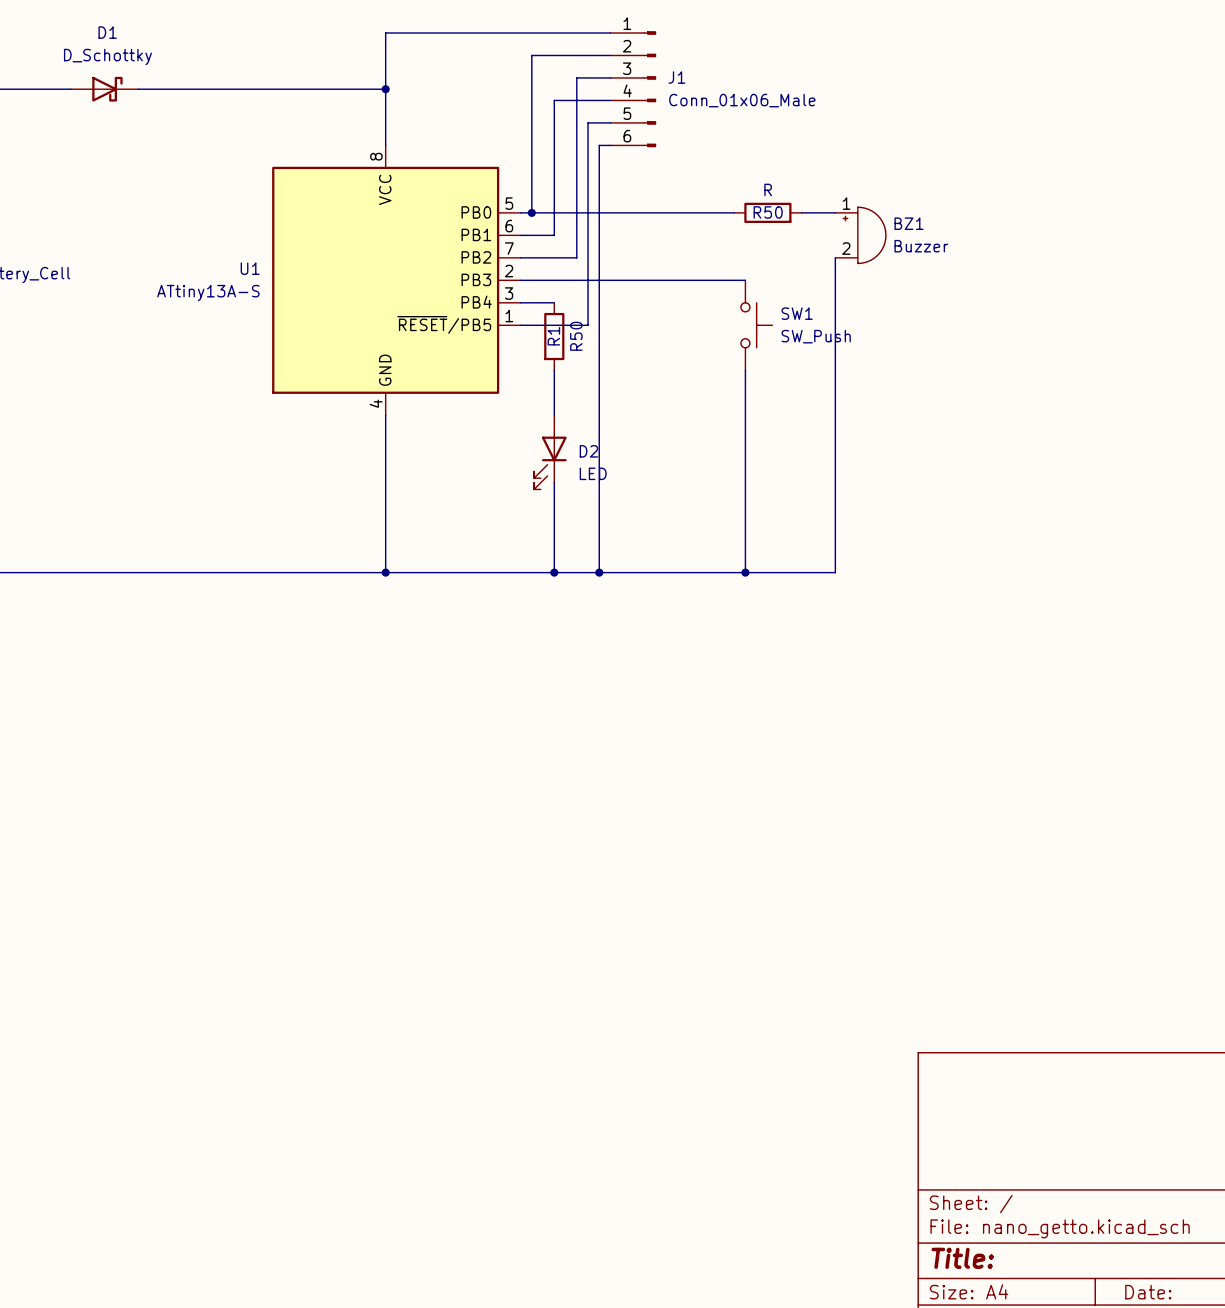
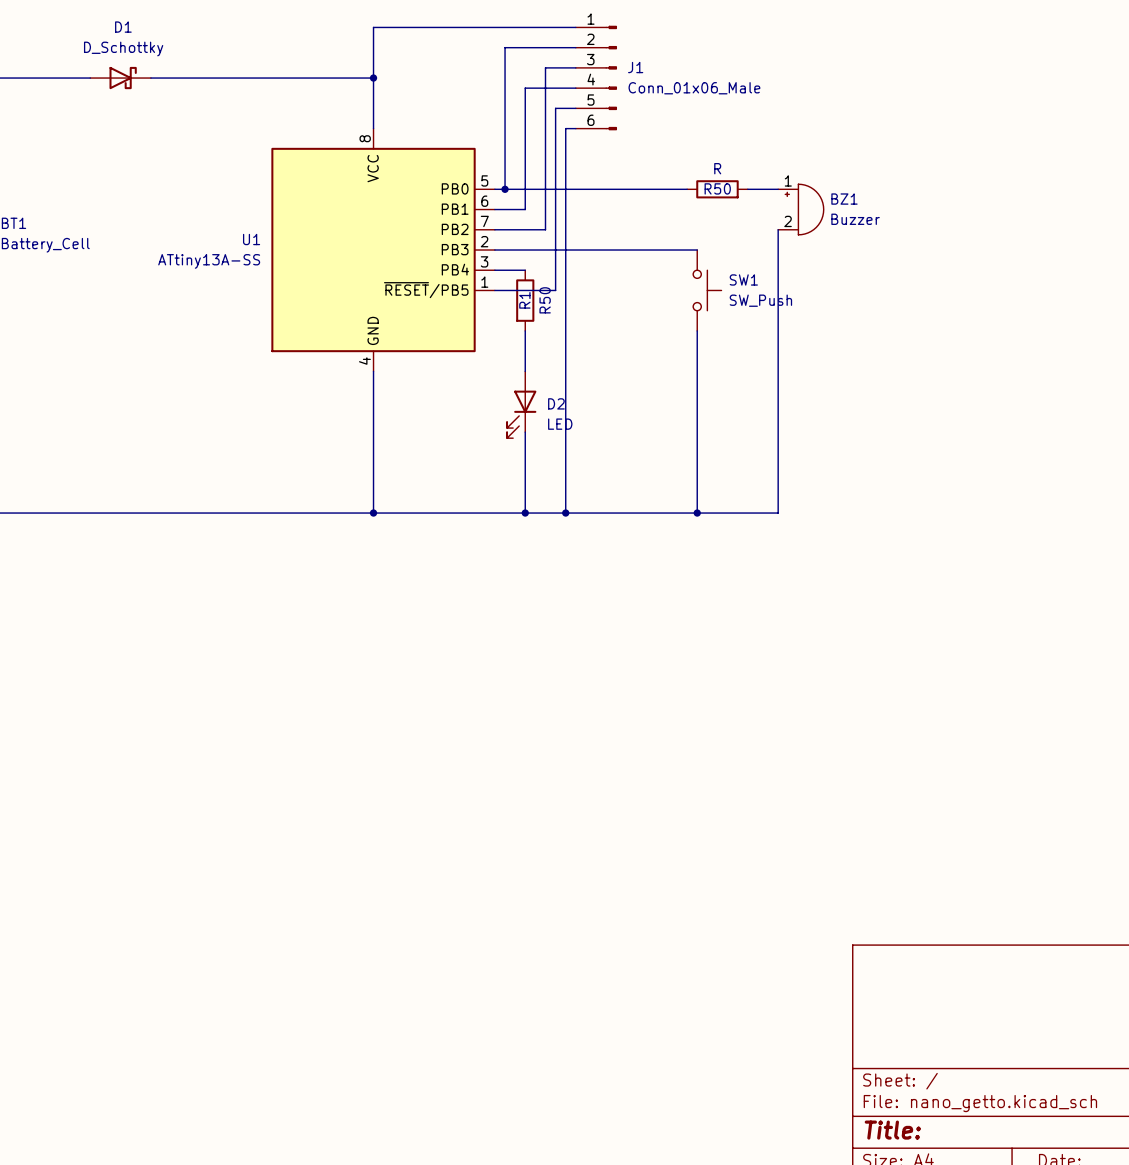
U1 value: ATtiny13A-S (208, 293) -> ATtiny13A-SS (209, 261)

